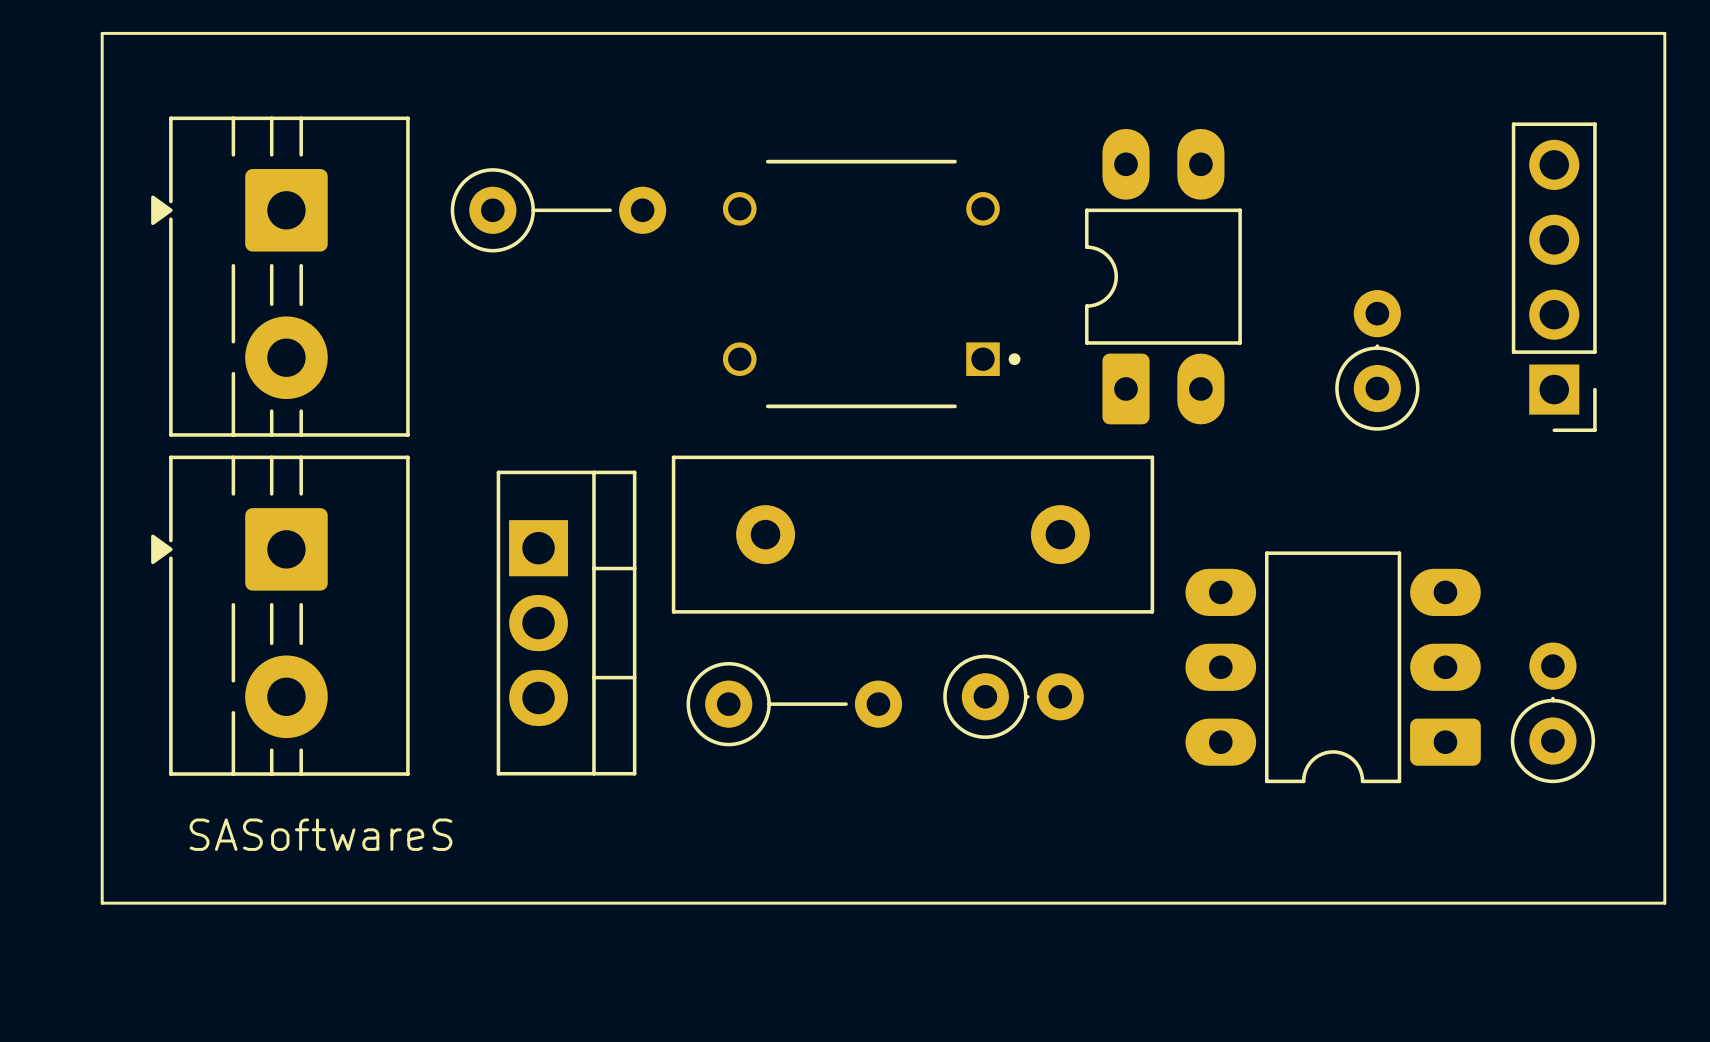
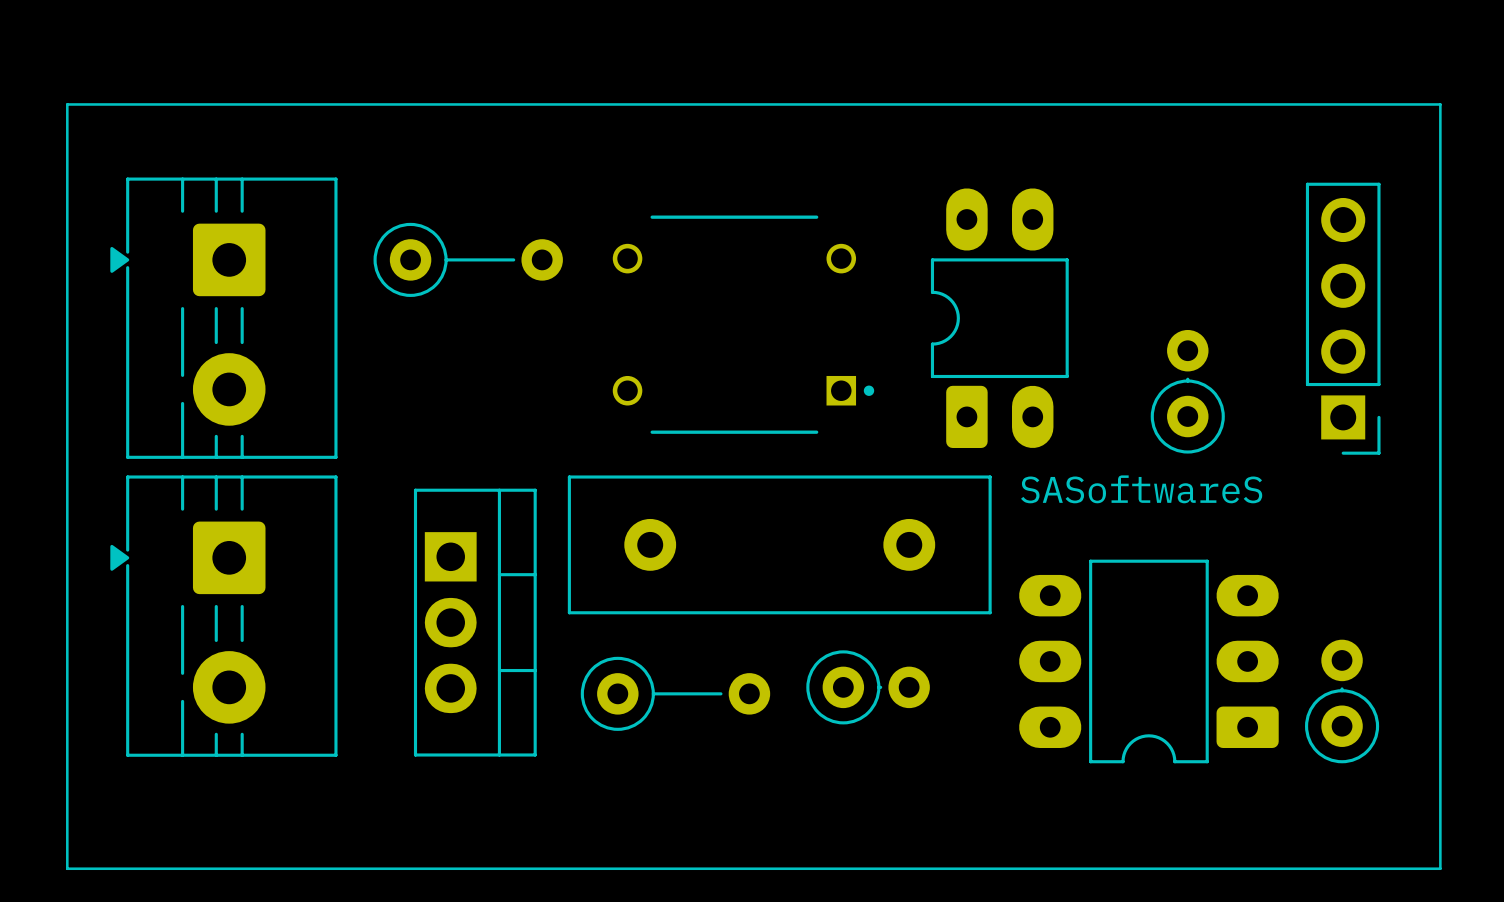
text: none -> SASoftwareS (1141, 489)
text: SASoftwareS (320, 834) -> none

